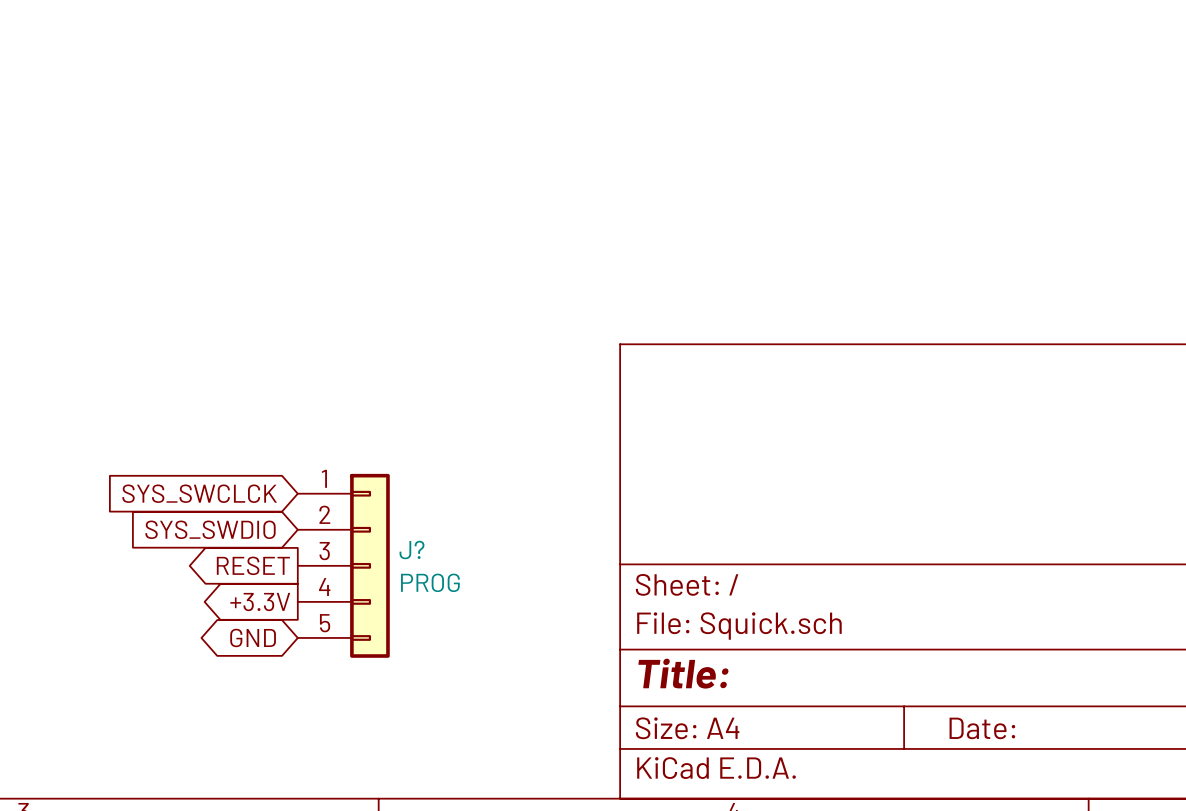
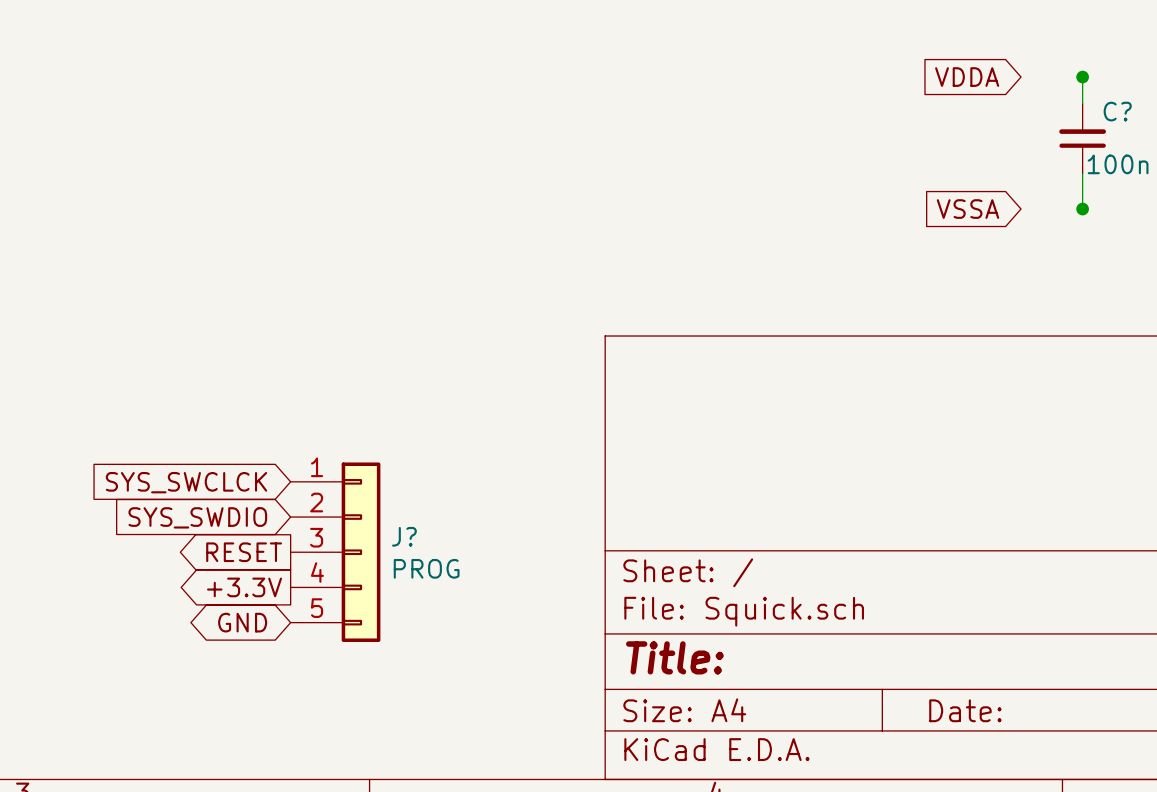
global label: none -> VDDA (967, 77)
wire: none -> (1082, 77) (1082, 103)
junction: none -> (1082, 77)
C?: none -> 100n (1082, 138)
wire: none -> (1082, 173) (1082, 209)
global label: none -> VSSA (967, 209)
junction: none -> (1082, 209)

